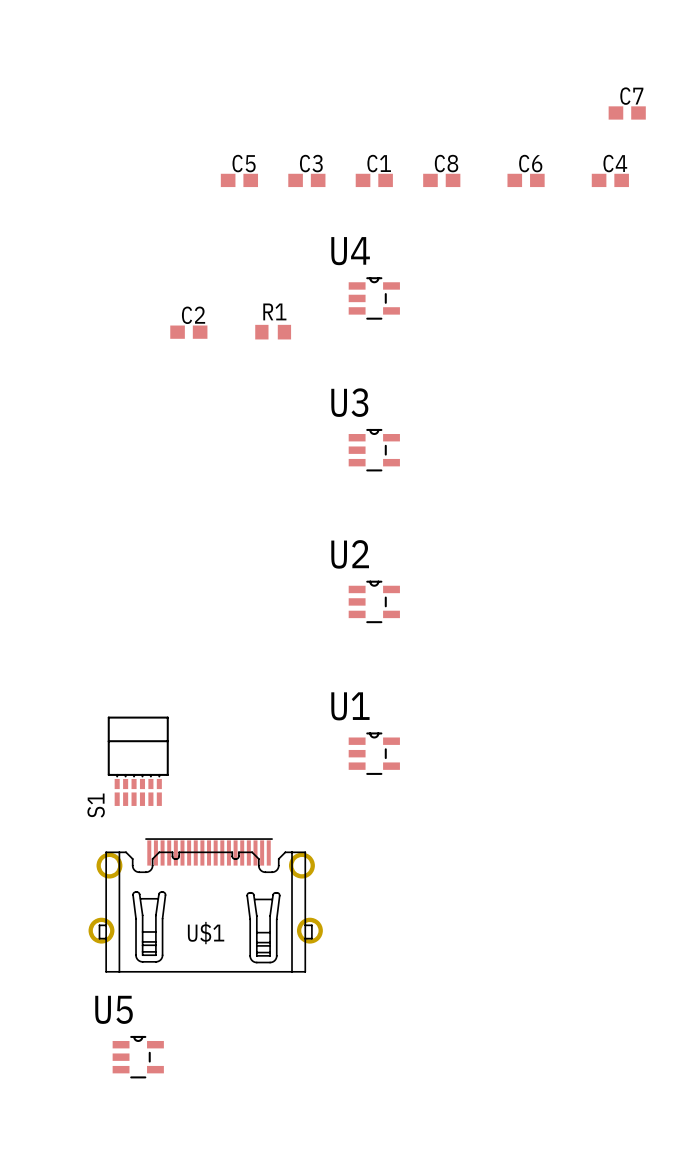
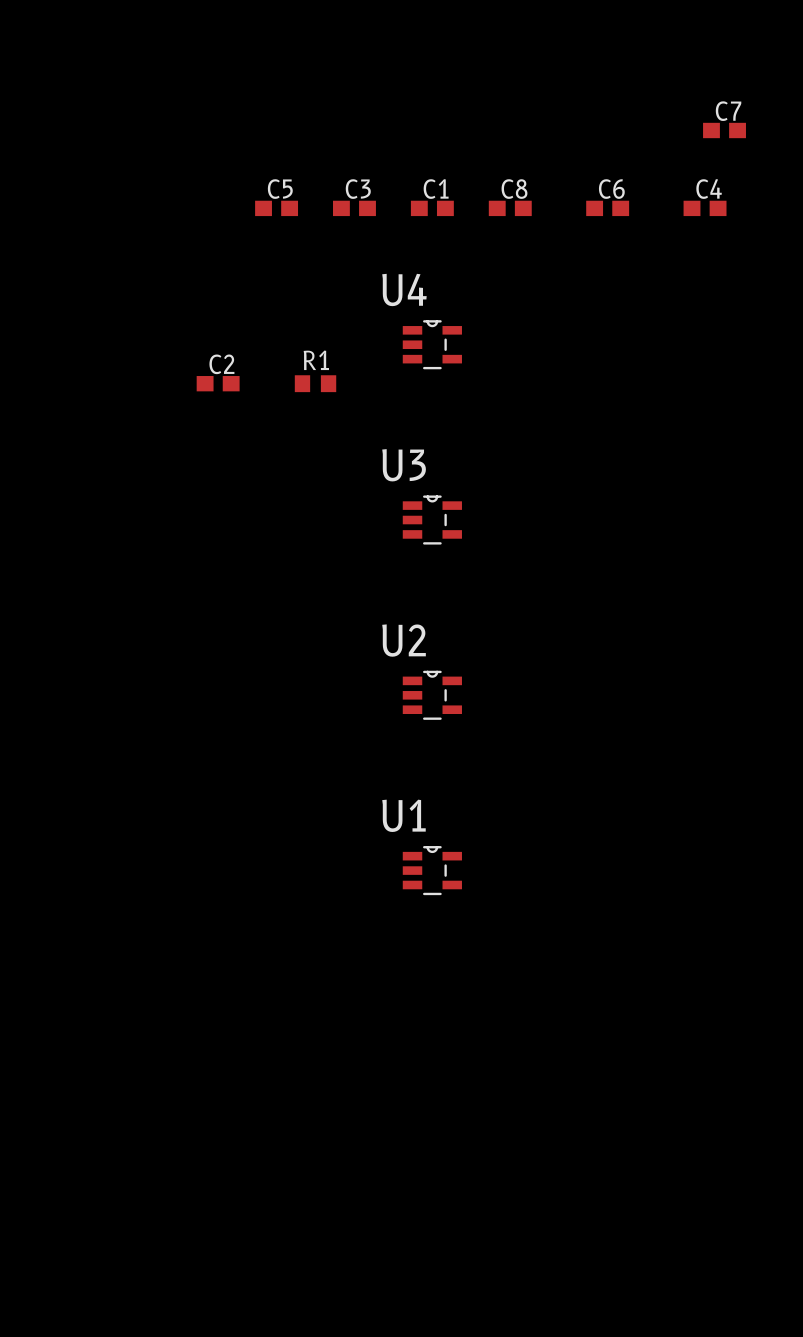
S1: (138, 761) -> none
U$1: (205, 905) -> none
U5: (138, 1057) -> none

